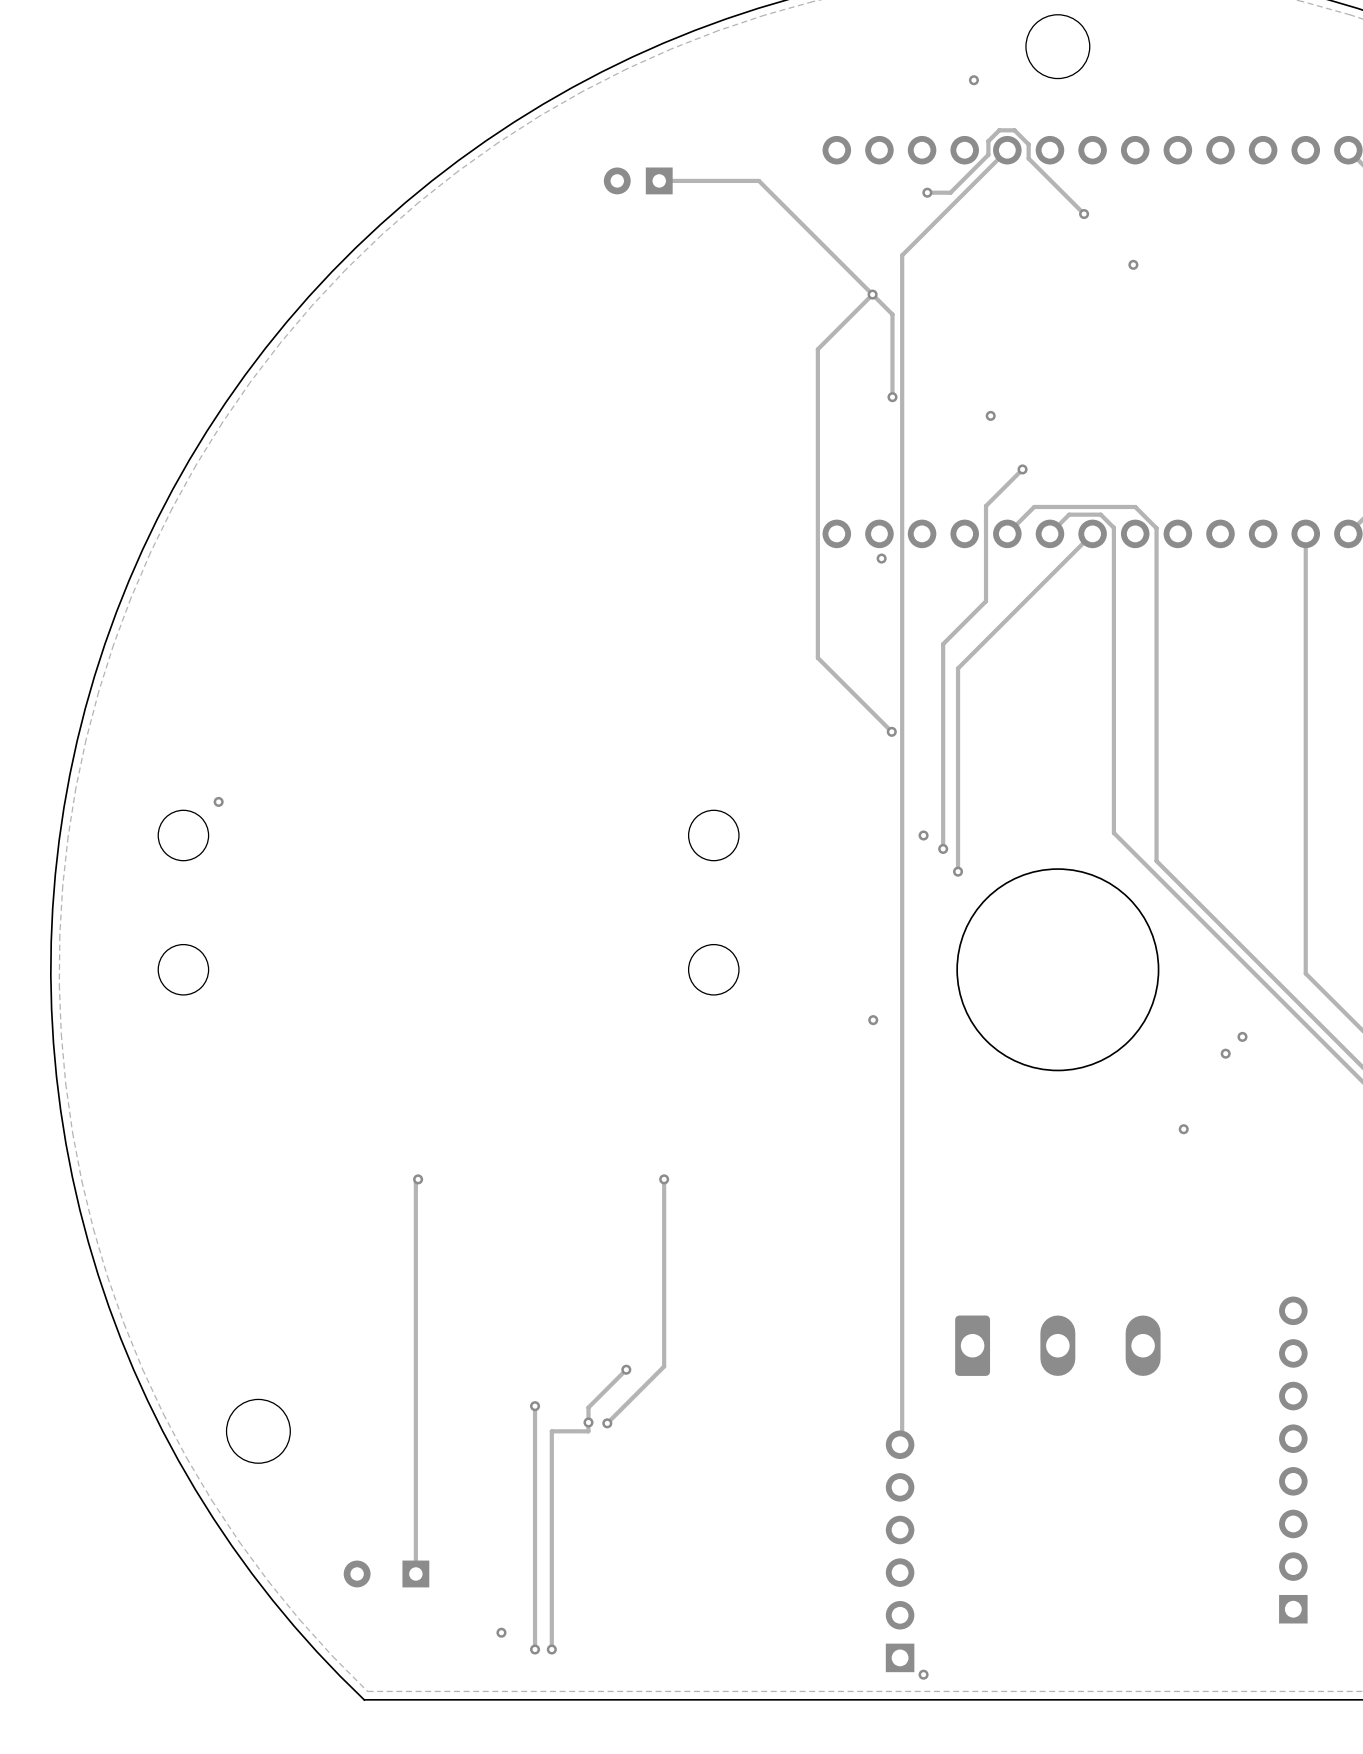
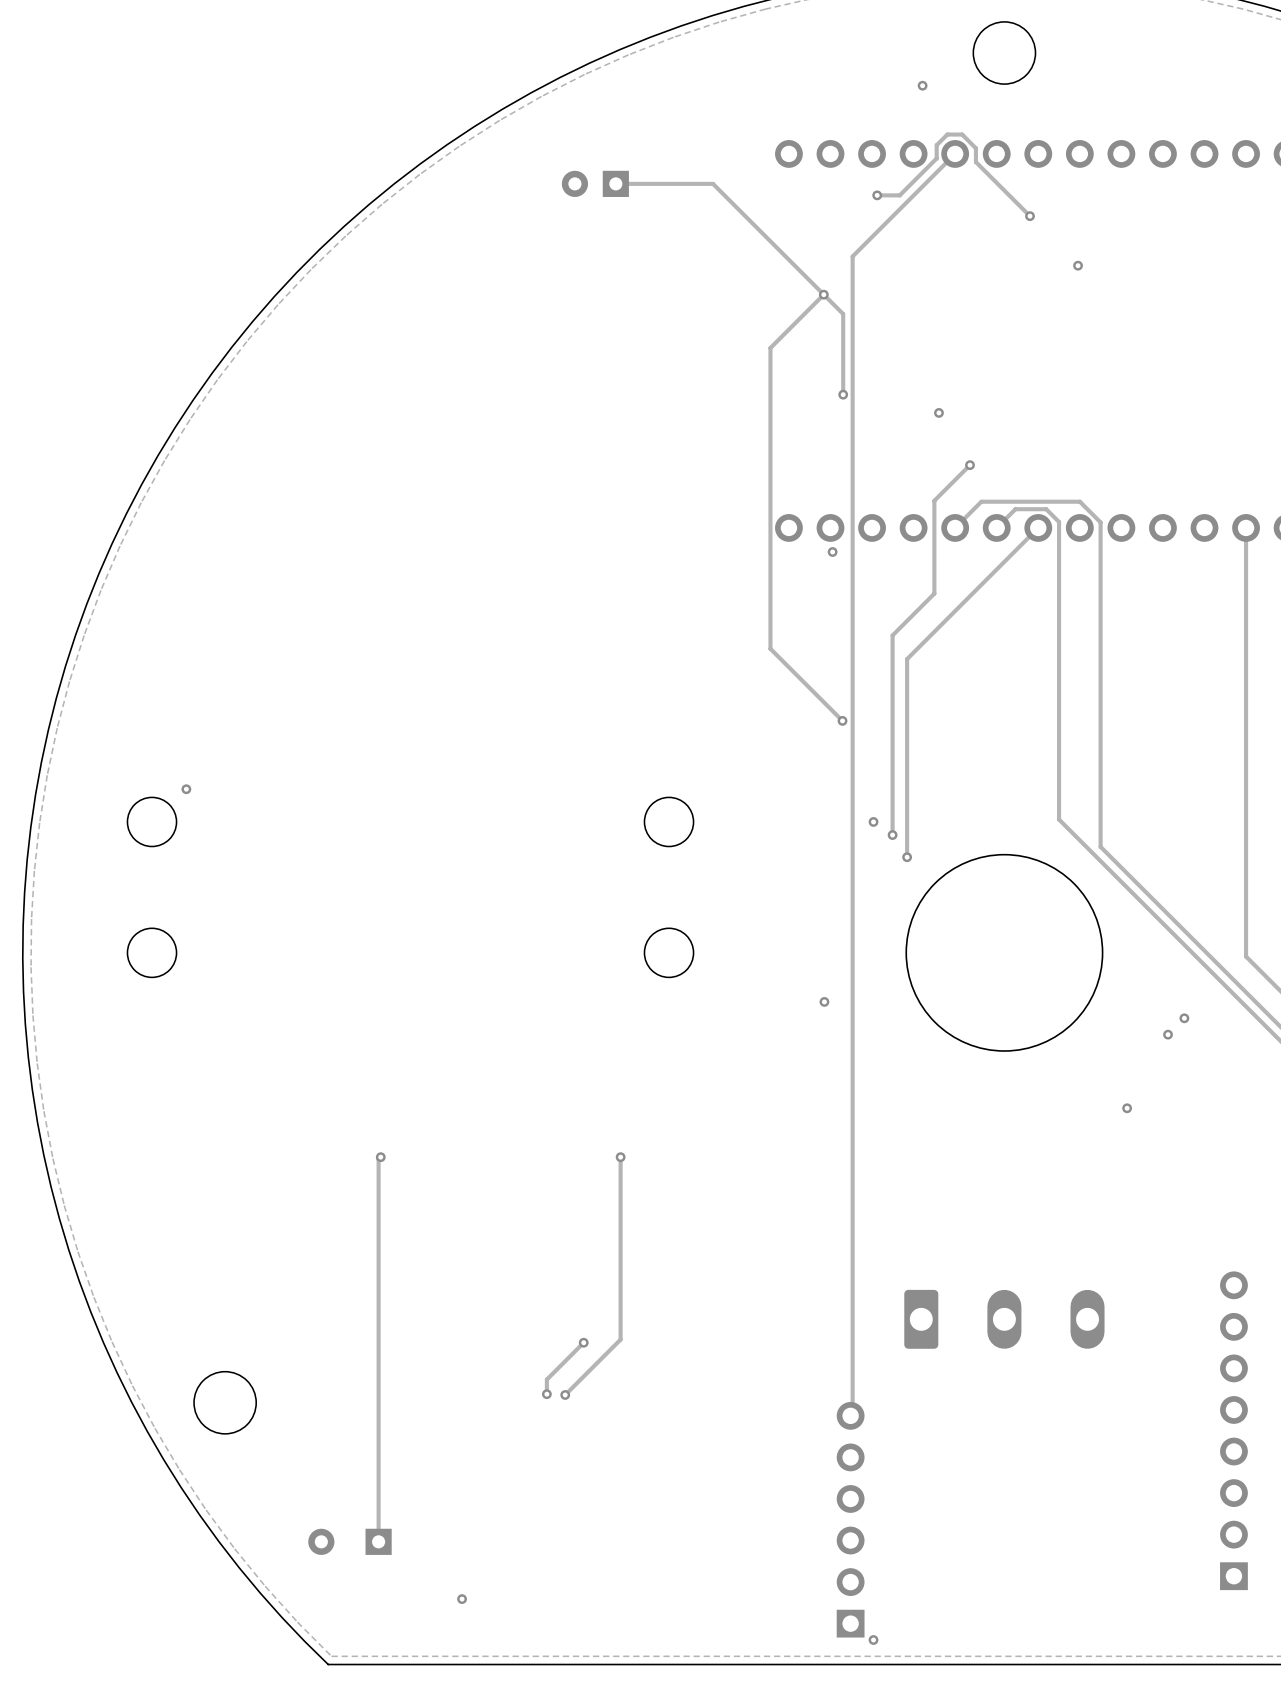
track: (535, 1406) (535, 1649) -> none
via: (535, 1406) -> none
track: (588, 1422) (588, 1431) (551, 1431) (551, 1649) -> none
via: (535, 1649) -> none
via: (551, 1649) -> none

